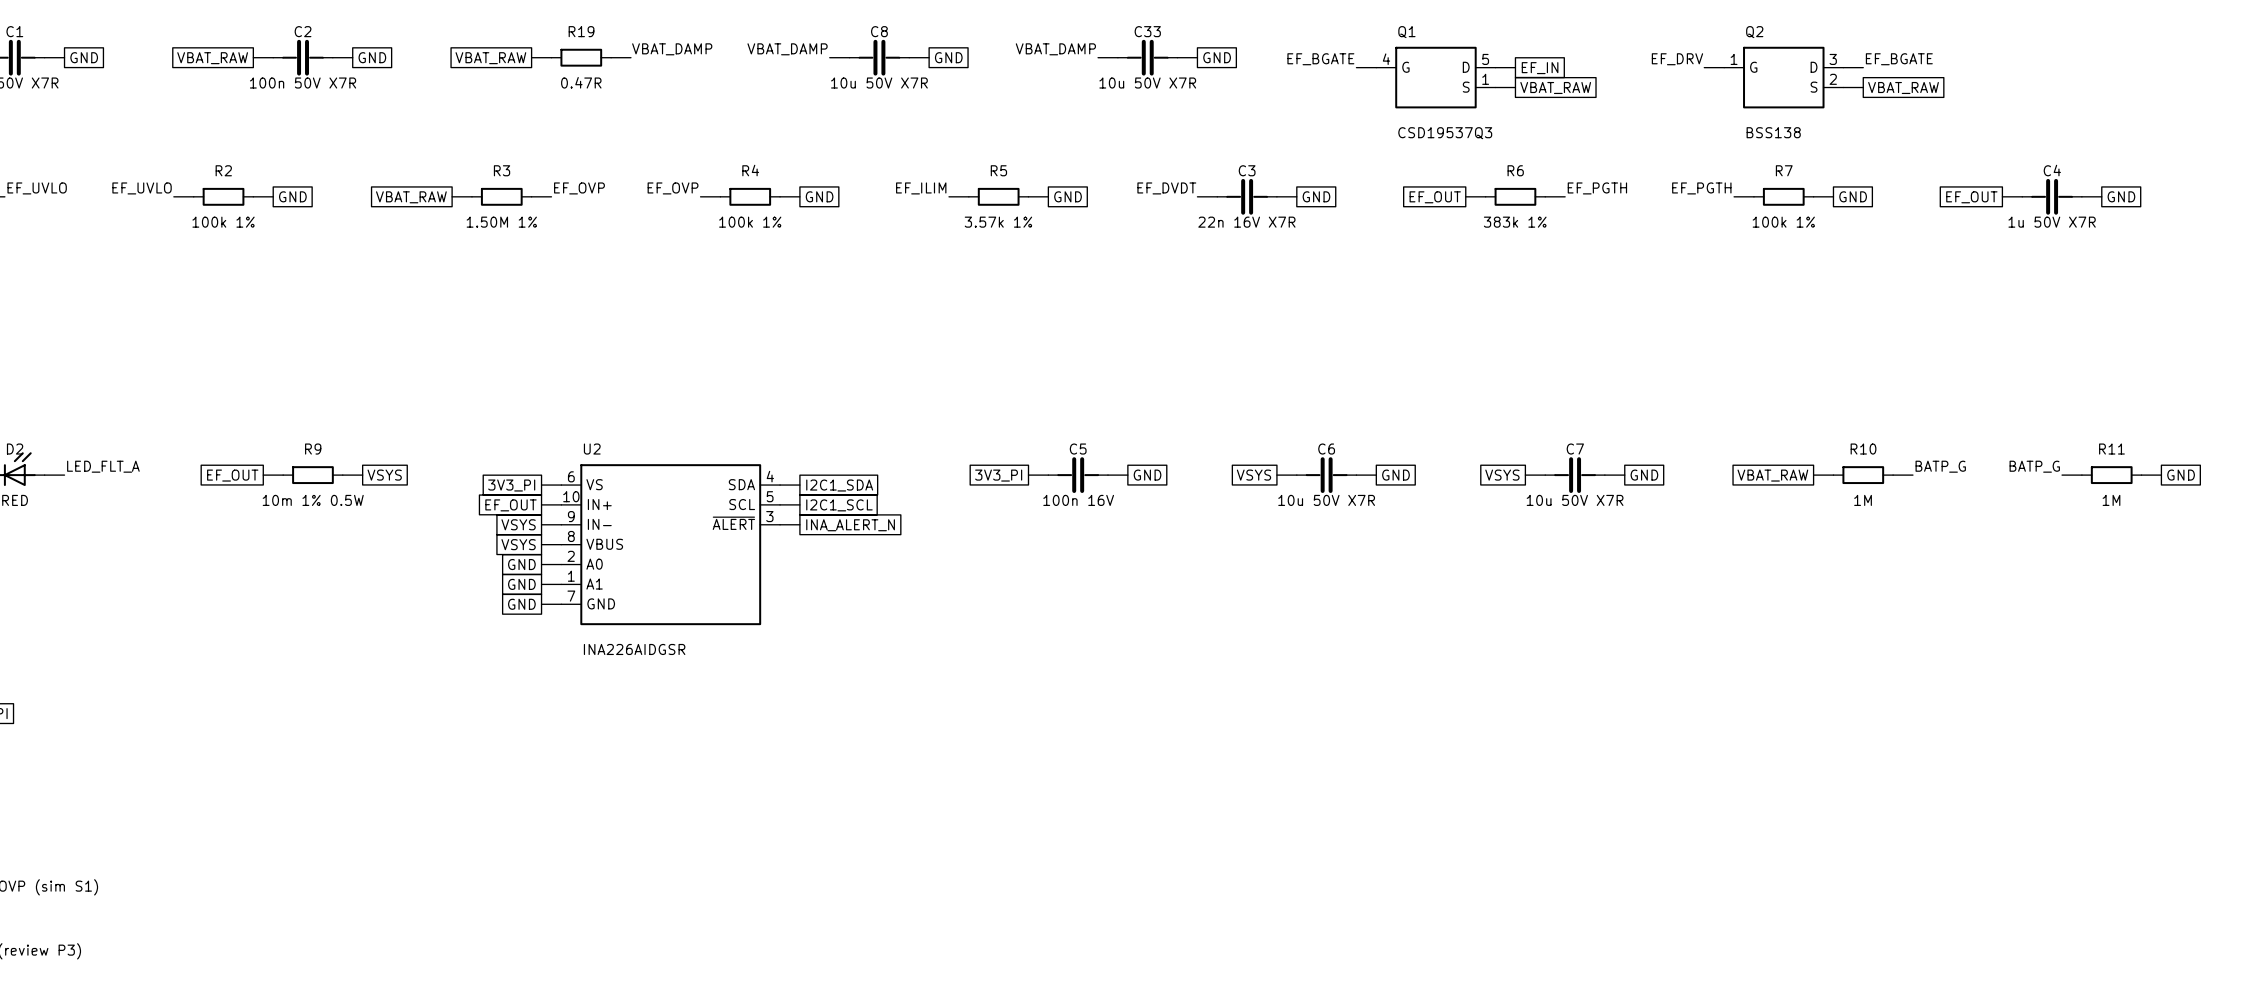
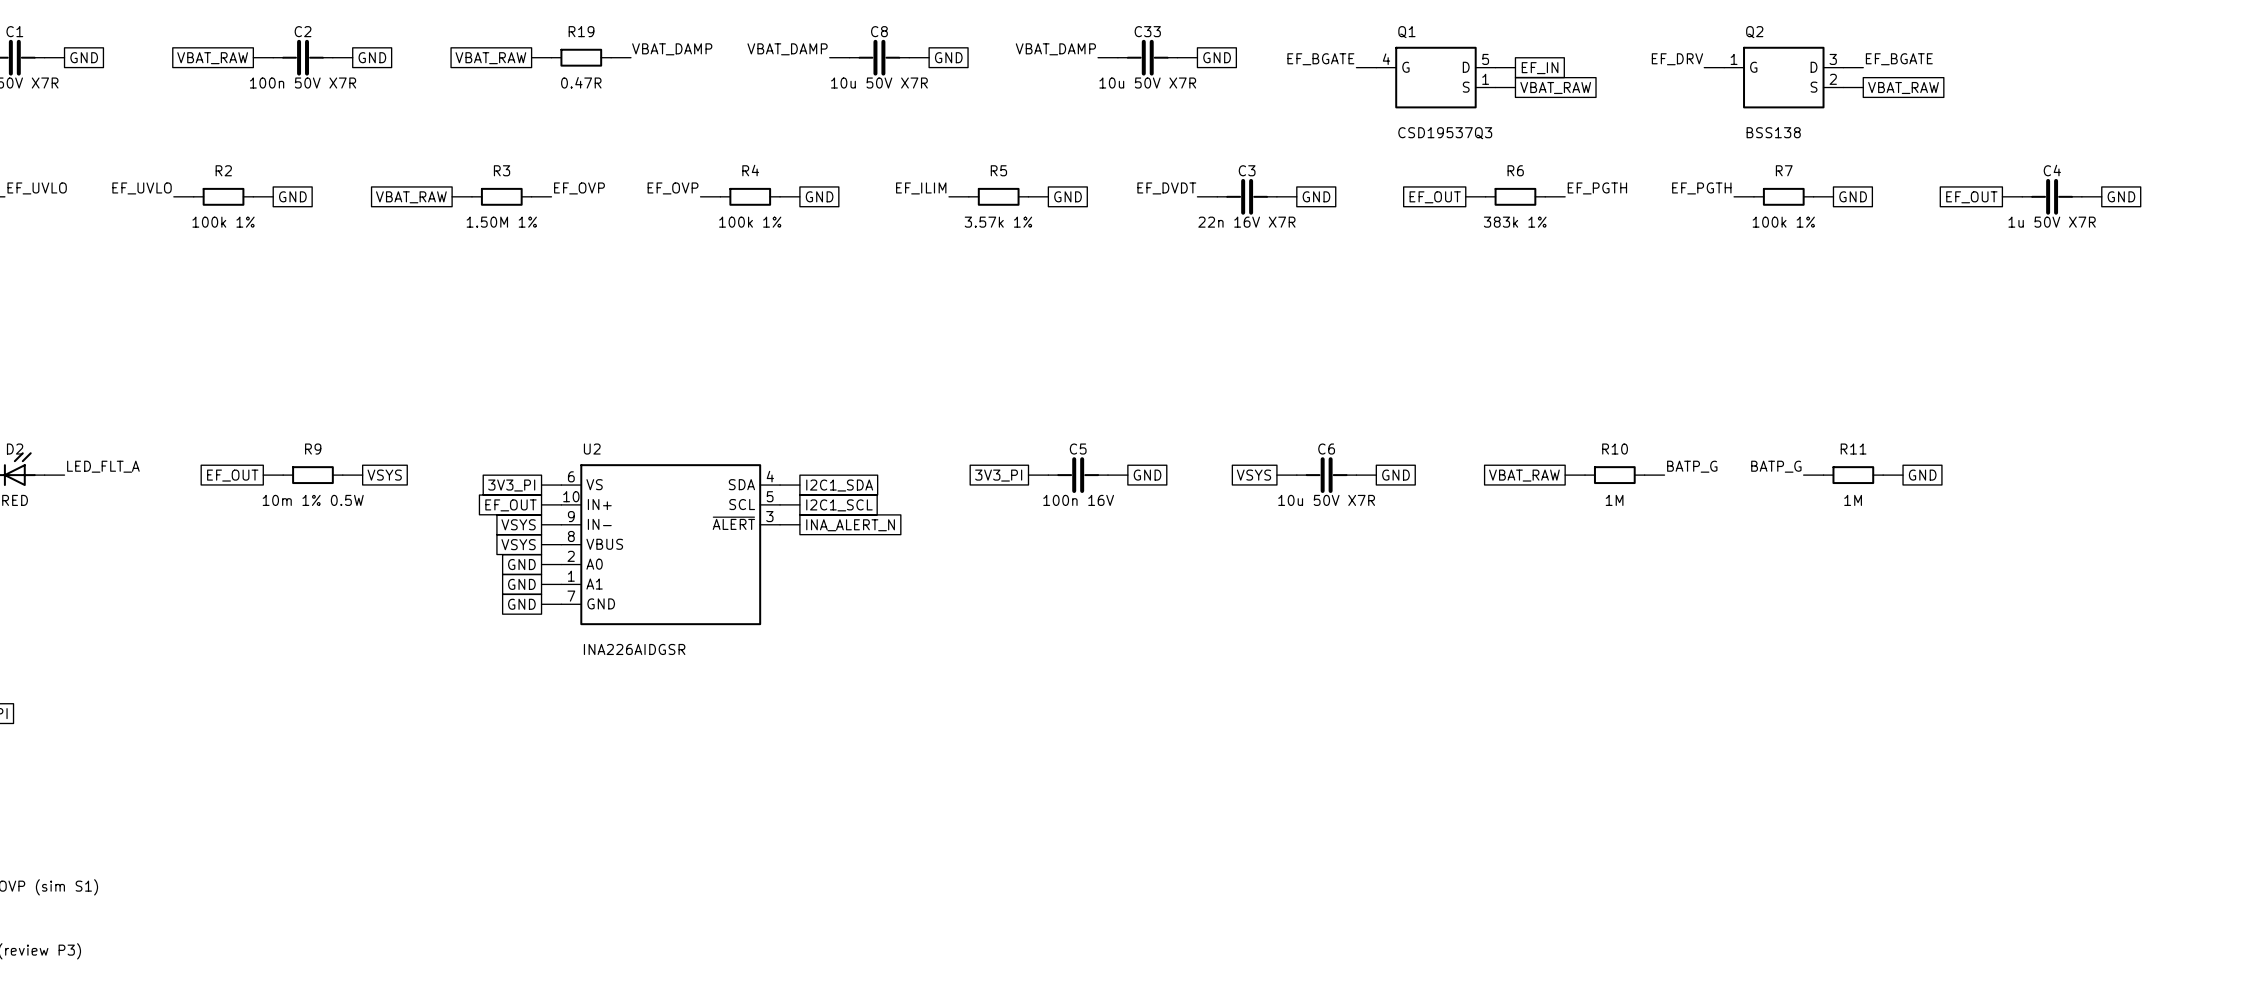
label: none -> BATP_G (1692, 466)
label position: BATP_G (1940, 466) -> BATP_G (1776, 466)
label: BATP_G (2034, 466) -> none
global label: VSYS (1502, 475) -> none
global label: none -> VBAT_RAW (1524, 475)
C7: 10u 50V X7R (1575, 475) -> none
wire: (1604, 475) (1624, 475) -> (1644, 475) (1664, 475)
global label: GND (1644, 475) -> none
global label: VBAT_RAW (1772, 475) -> none
R10 position: (1863, 475) -> (1614, 475)
global label: none -> GND (1922, 475)
wire: (2062, 475) (2081, 475) -> none
R11 position: (2111, 475) -> (1853, 475)
wire: (2141, 475) (2161, 475) -> none
global label: GND (2181, 475) -> none

